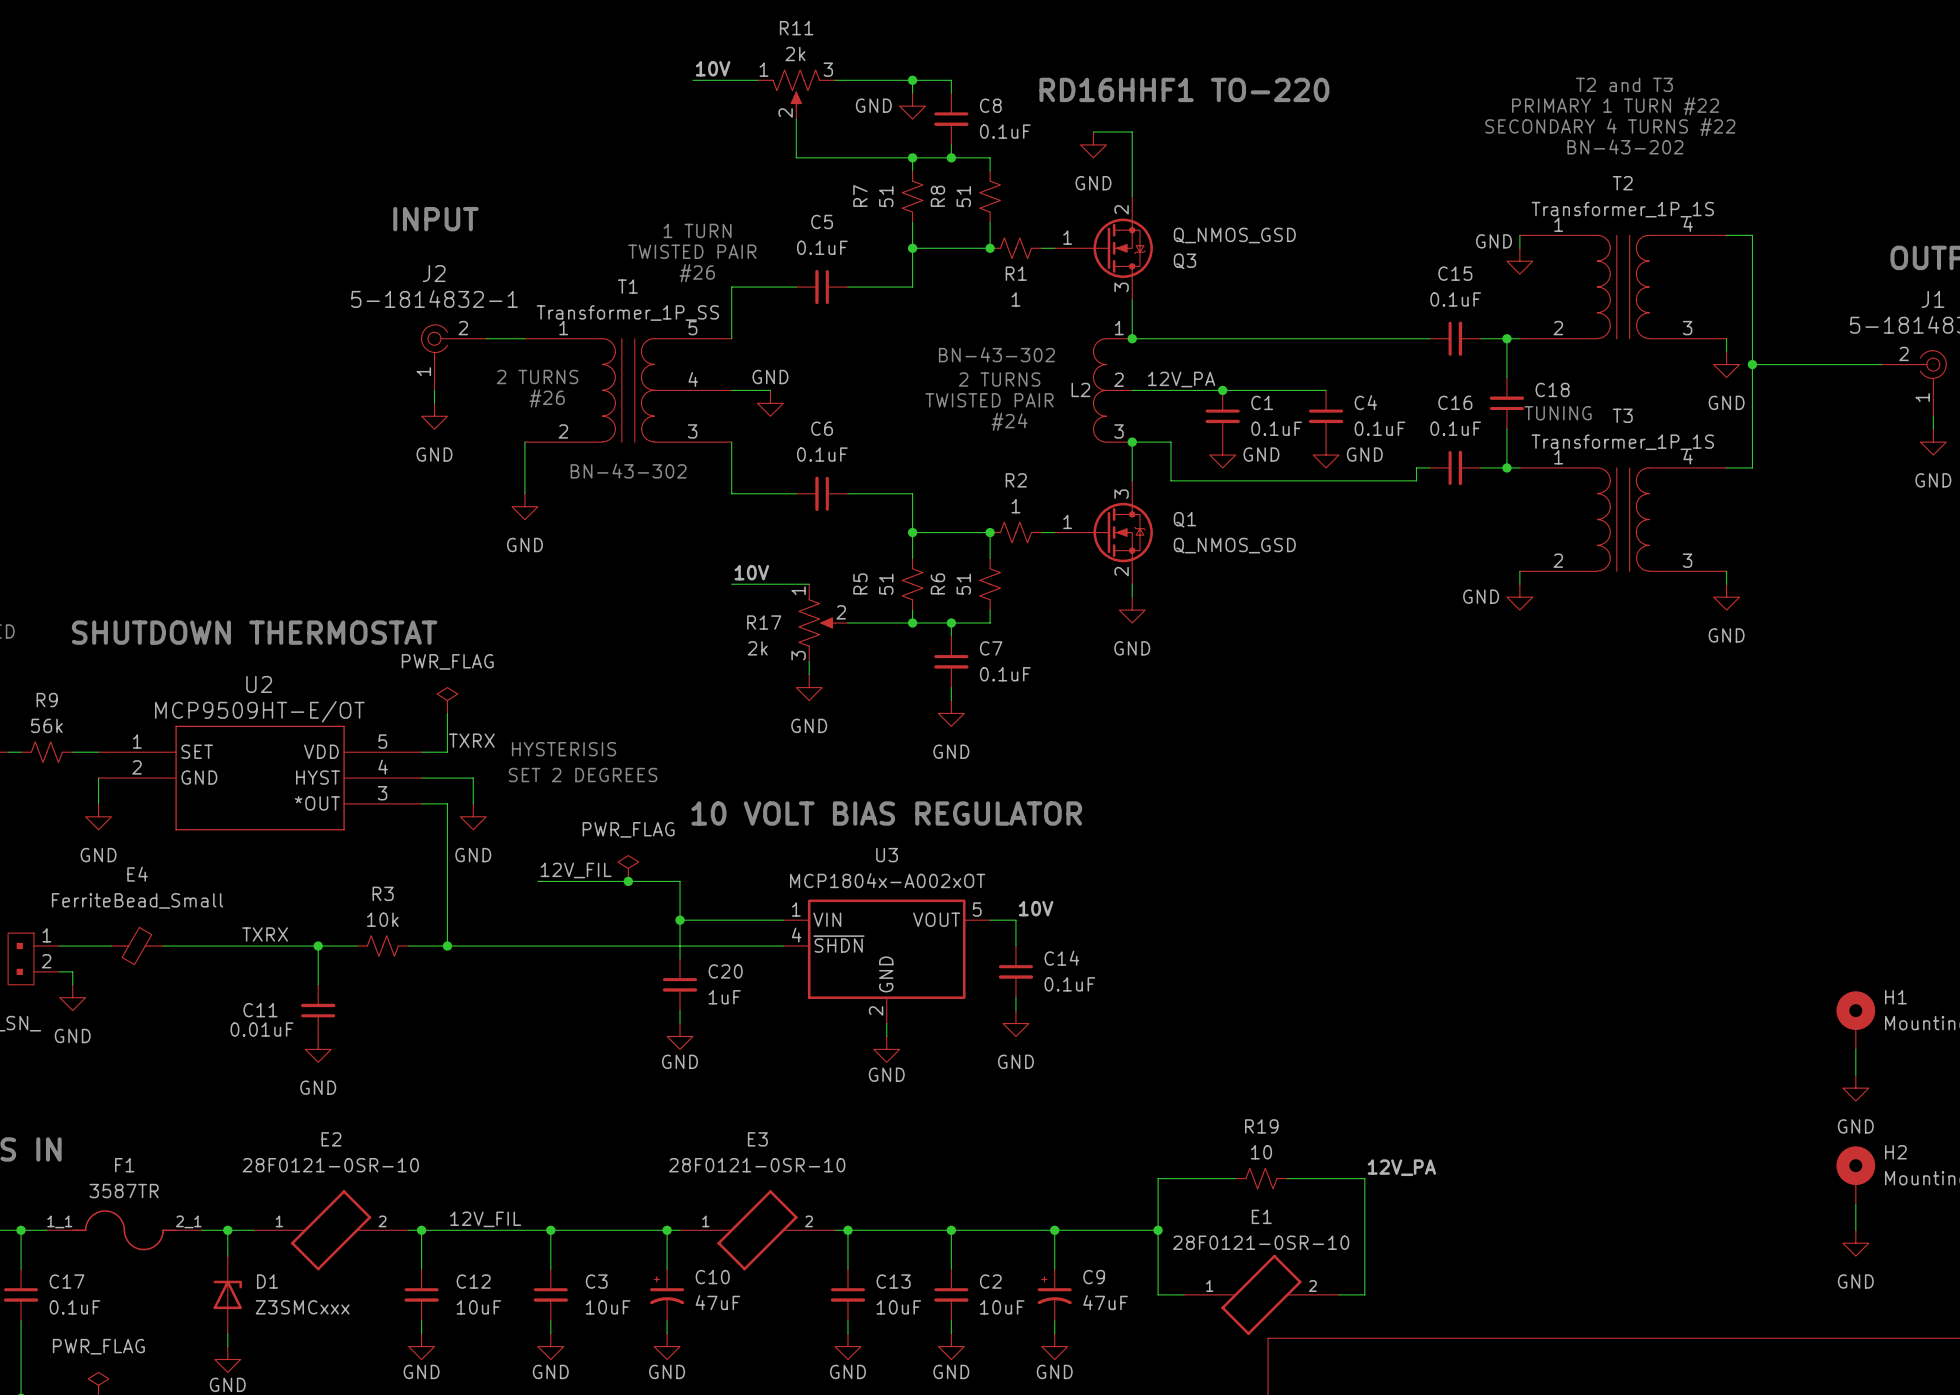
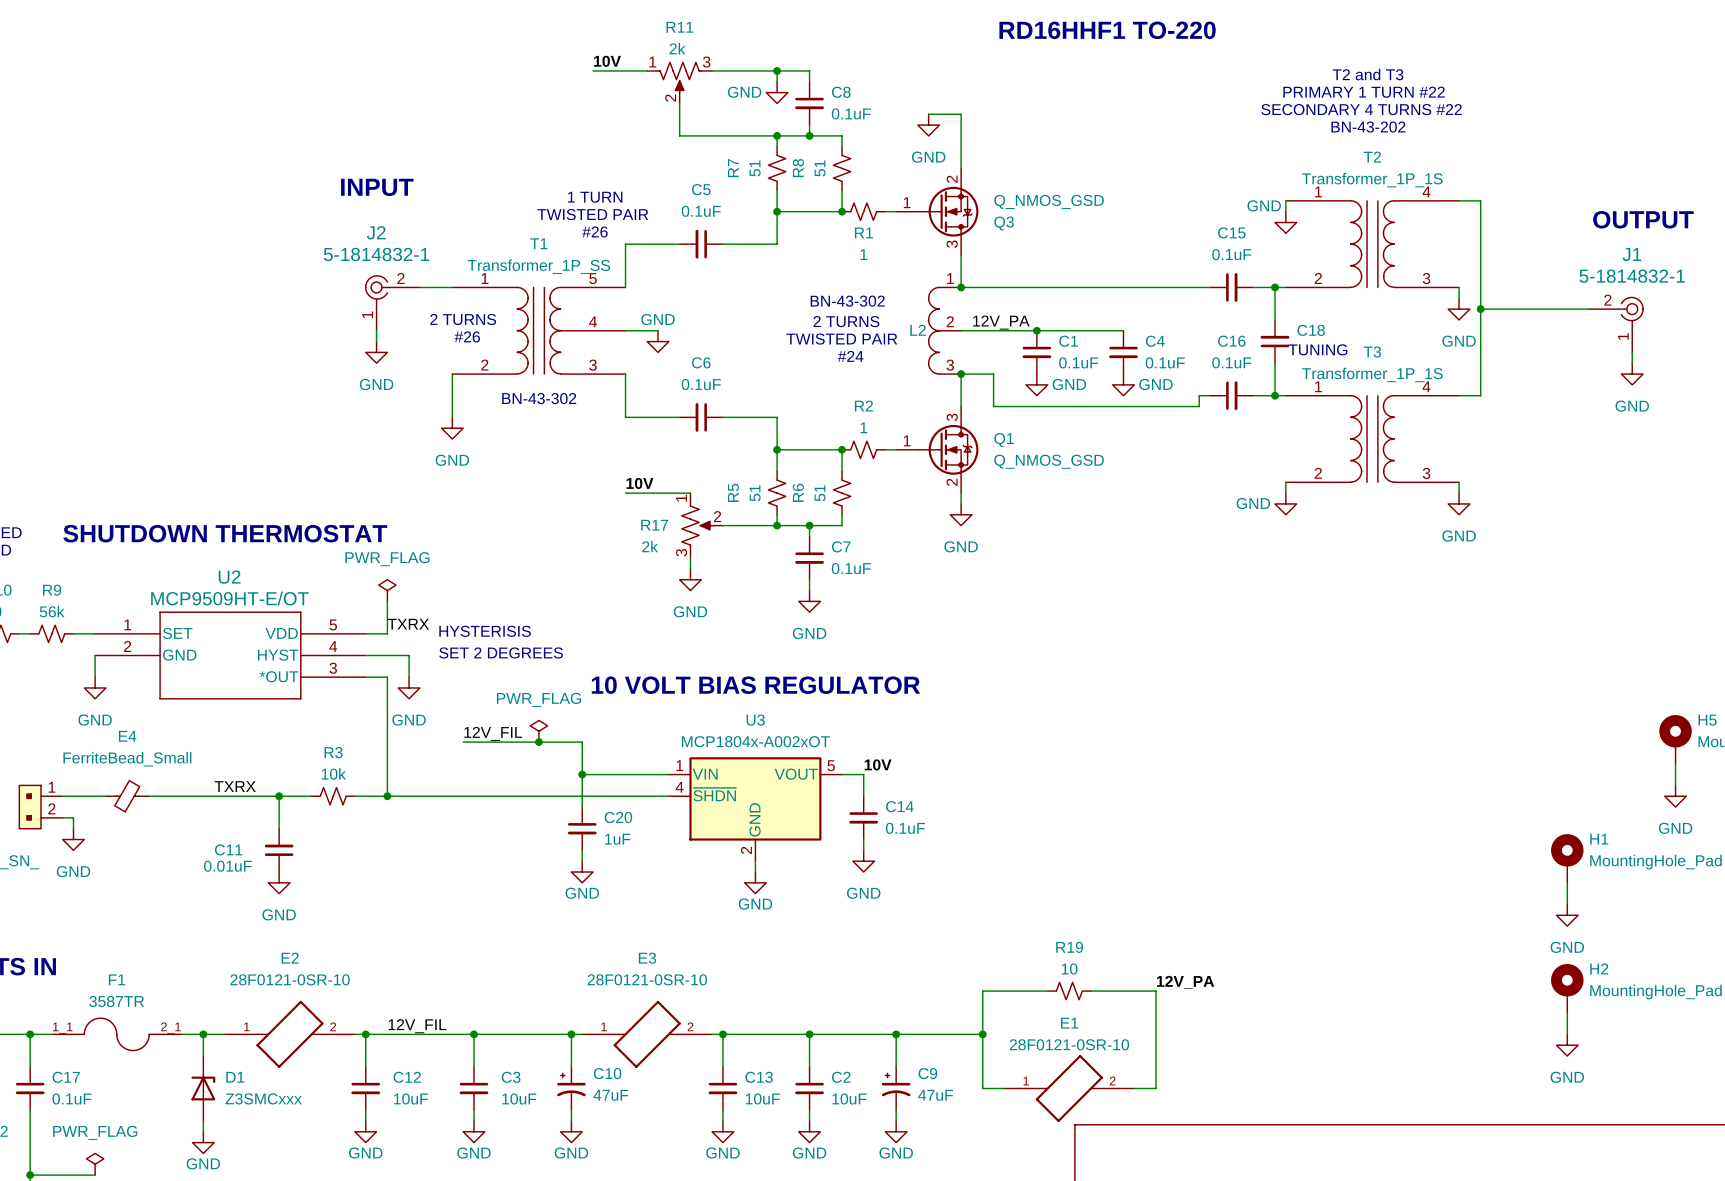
text position: RD16HHF1 TO-220 (1184, 89) -> RD16HHF1 TO-220 (1107, 30)

